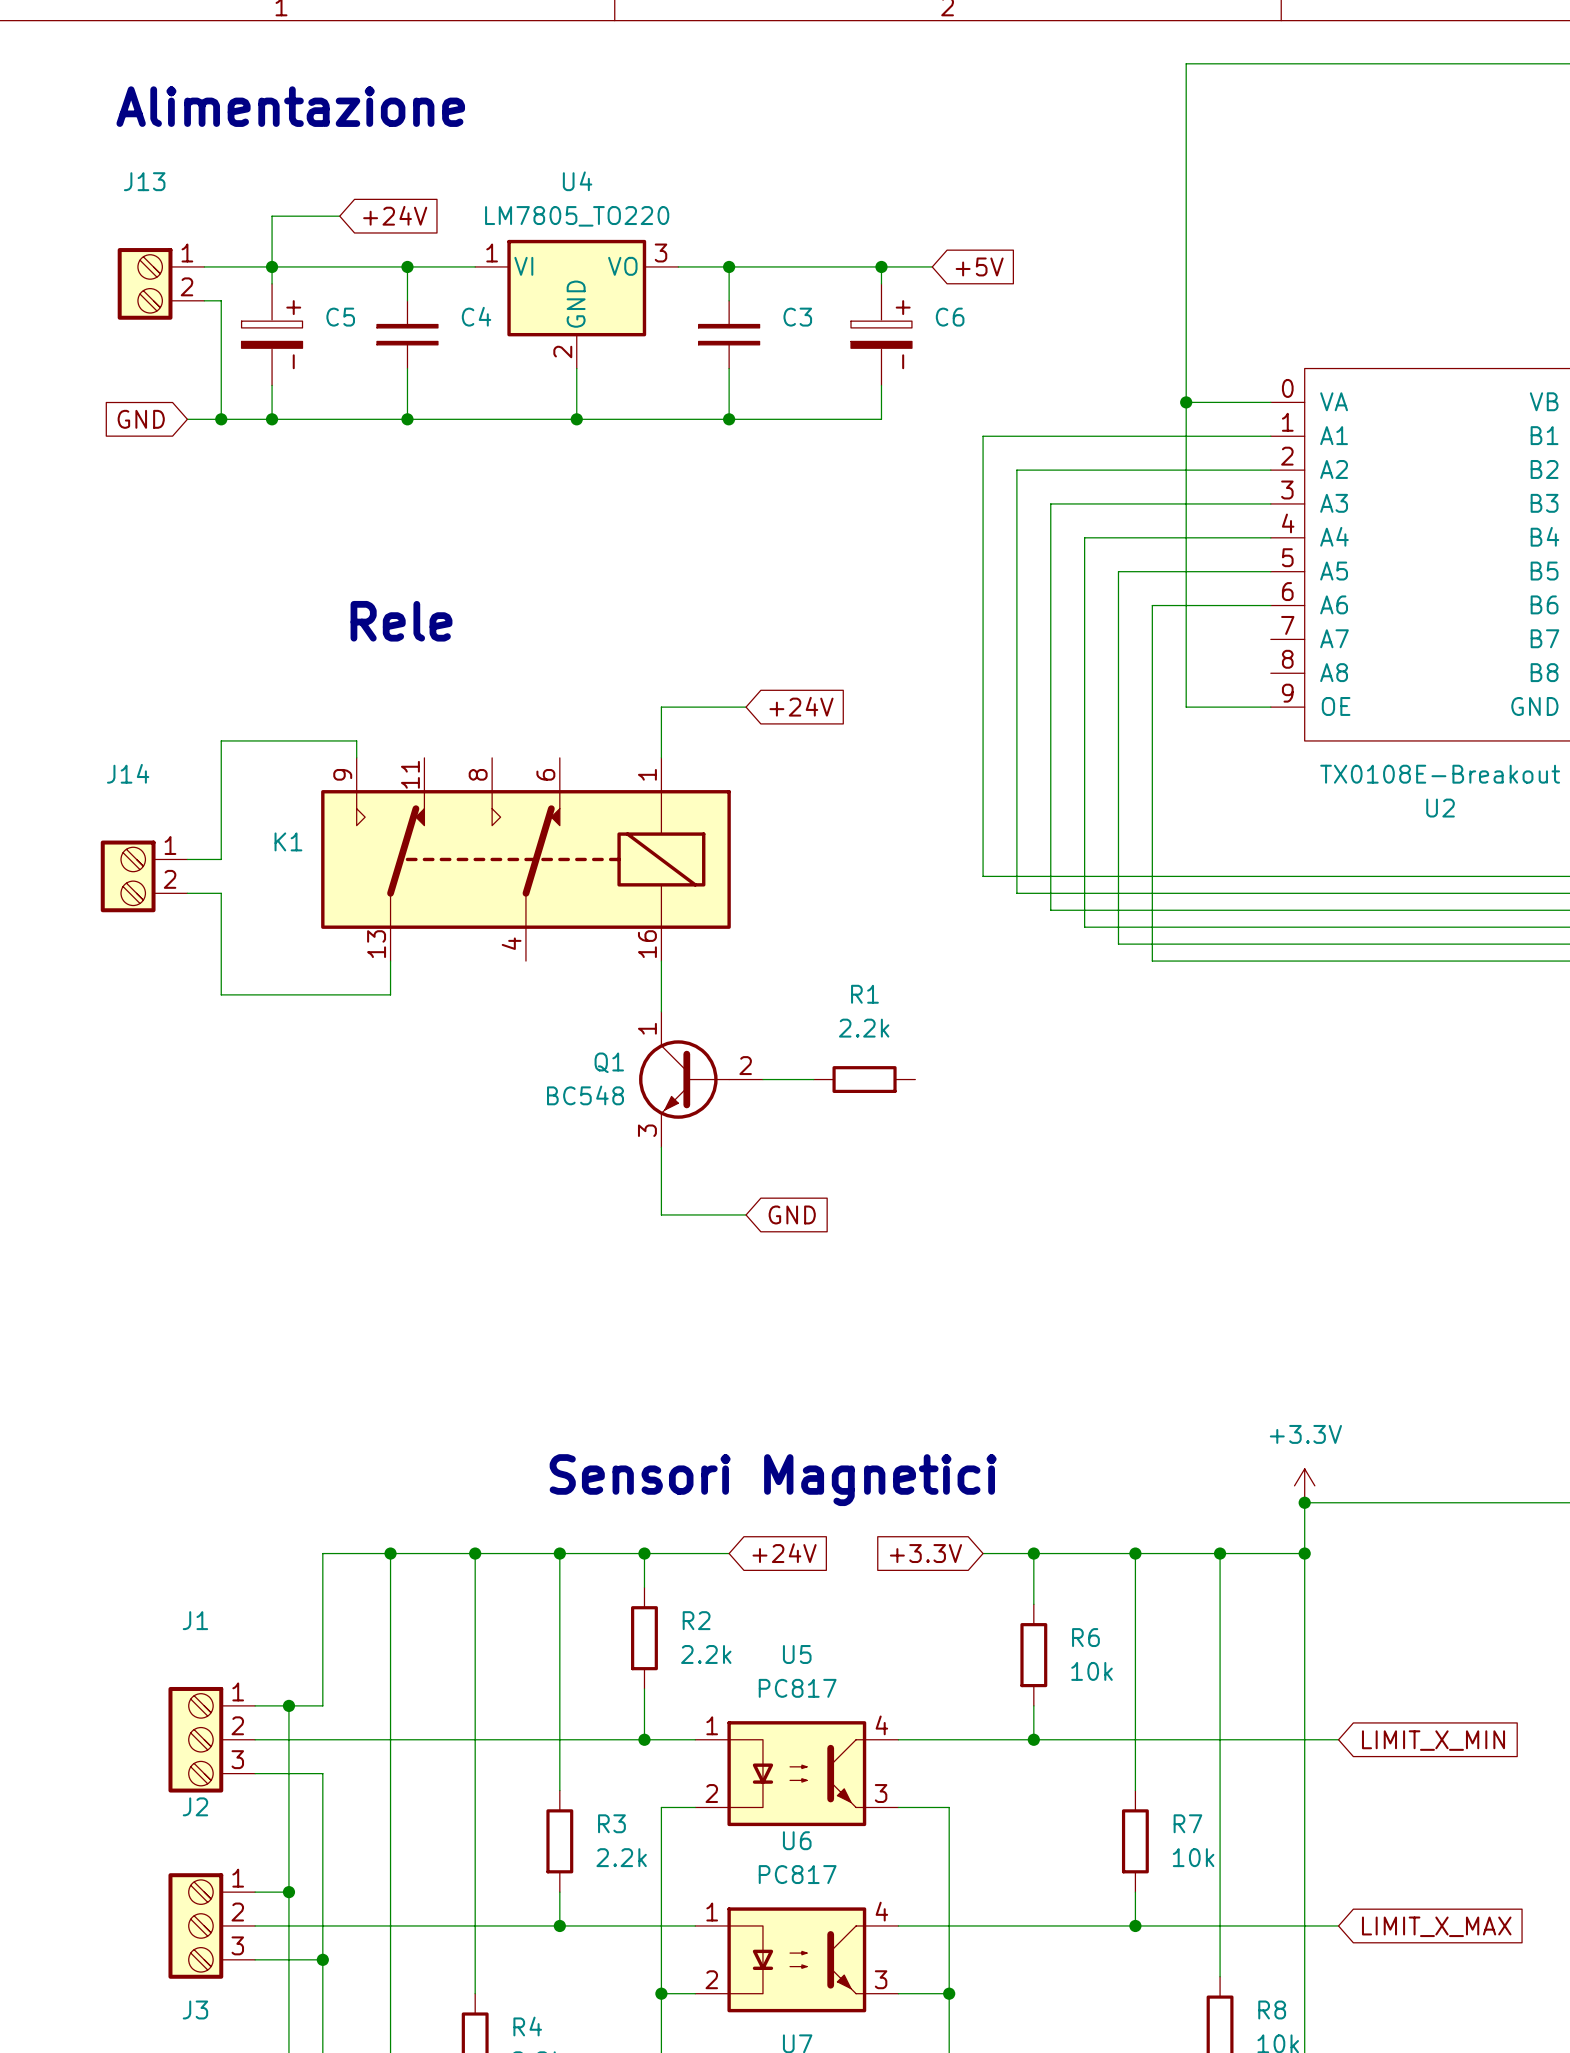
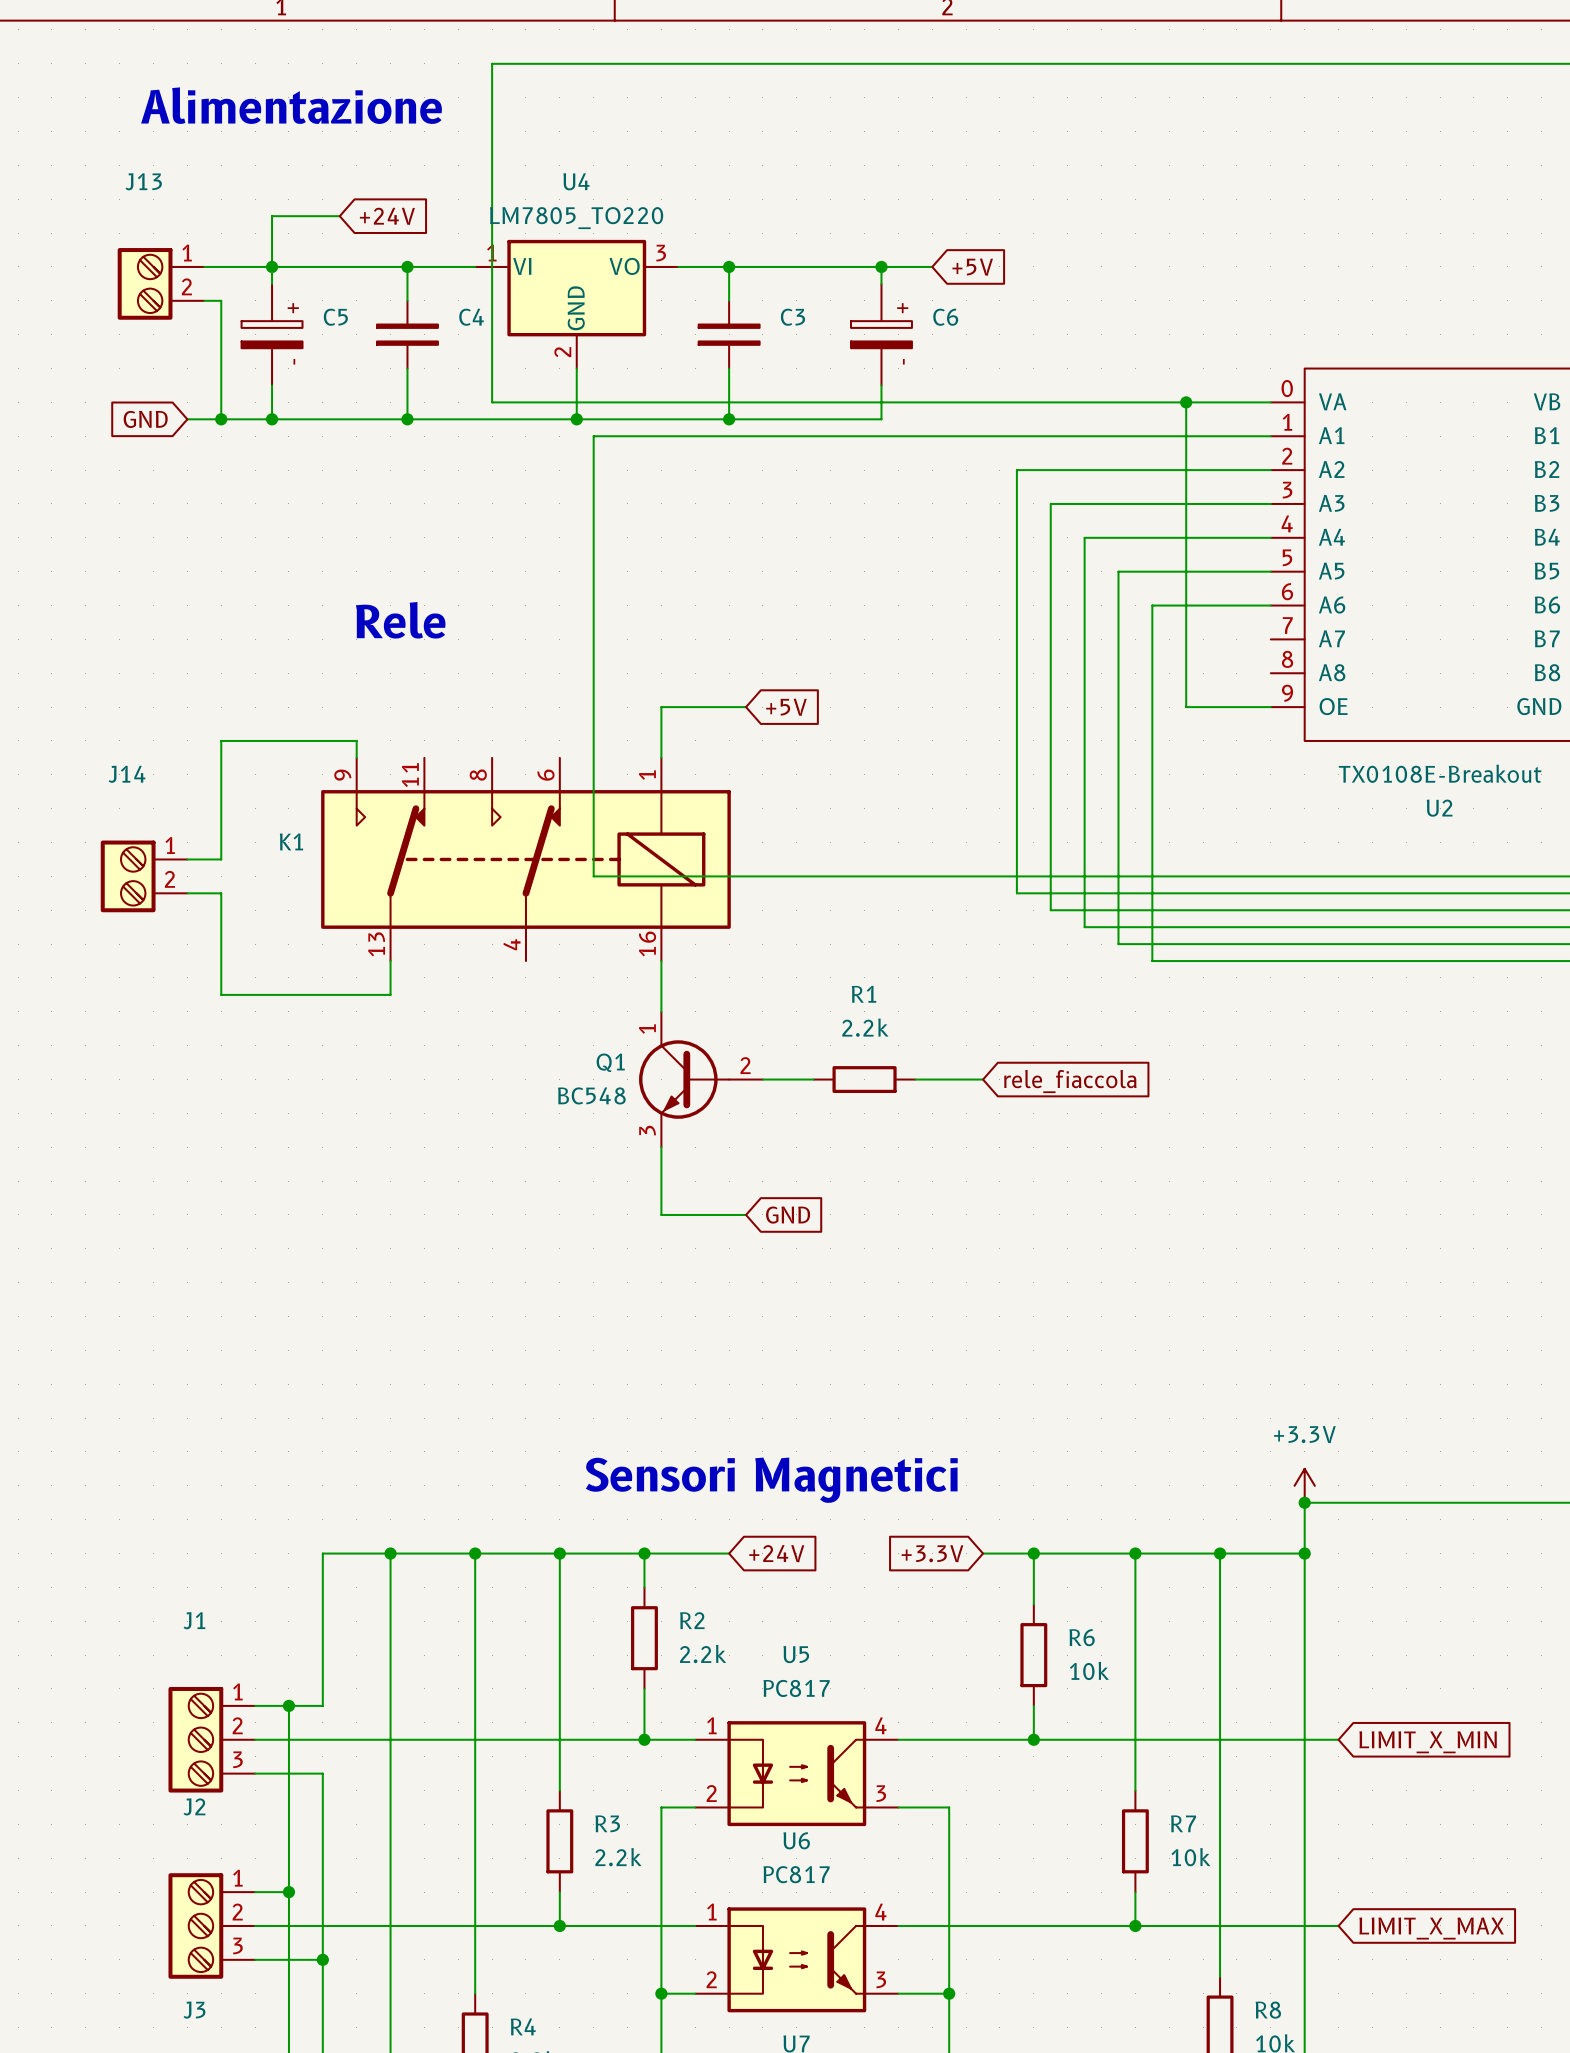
wire: (1186, 63) (1186, 402) -> (1186, 63) (492, 63) (492, 402) (1186, 402)
wire: (983, 436) (983, 876) -> (983, 436) (593, 436) (593, 876) (983, 876)
global label: +24V (801, 706) -> +5V (786, 707)
wire: none -> (915, 1079) (983, 1079)
global label: none -> rele_fiaccola (1070, 1081)

